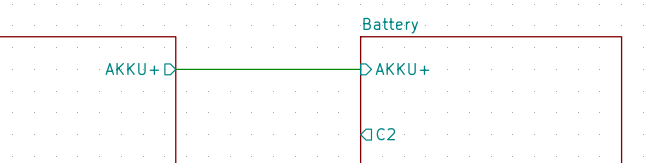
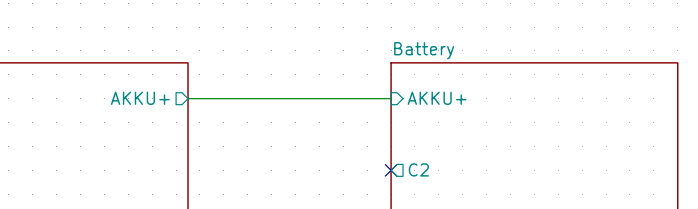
no-connect mark: none -> (391, 170)

